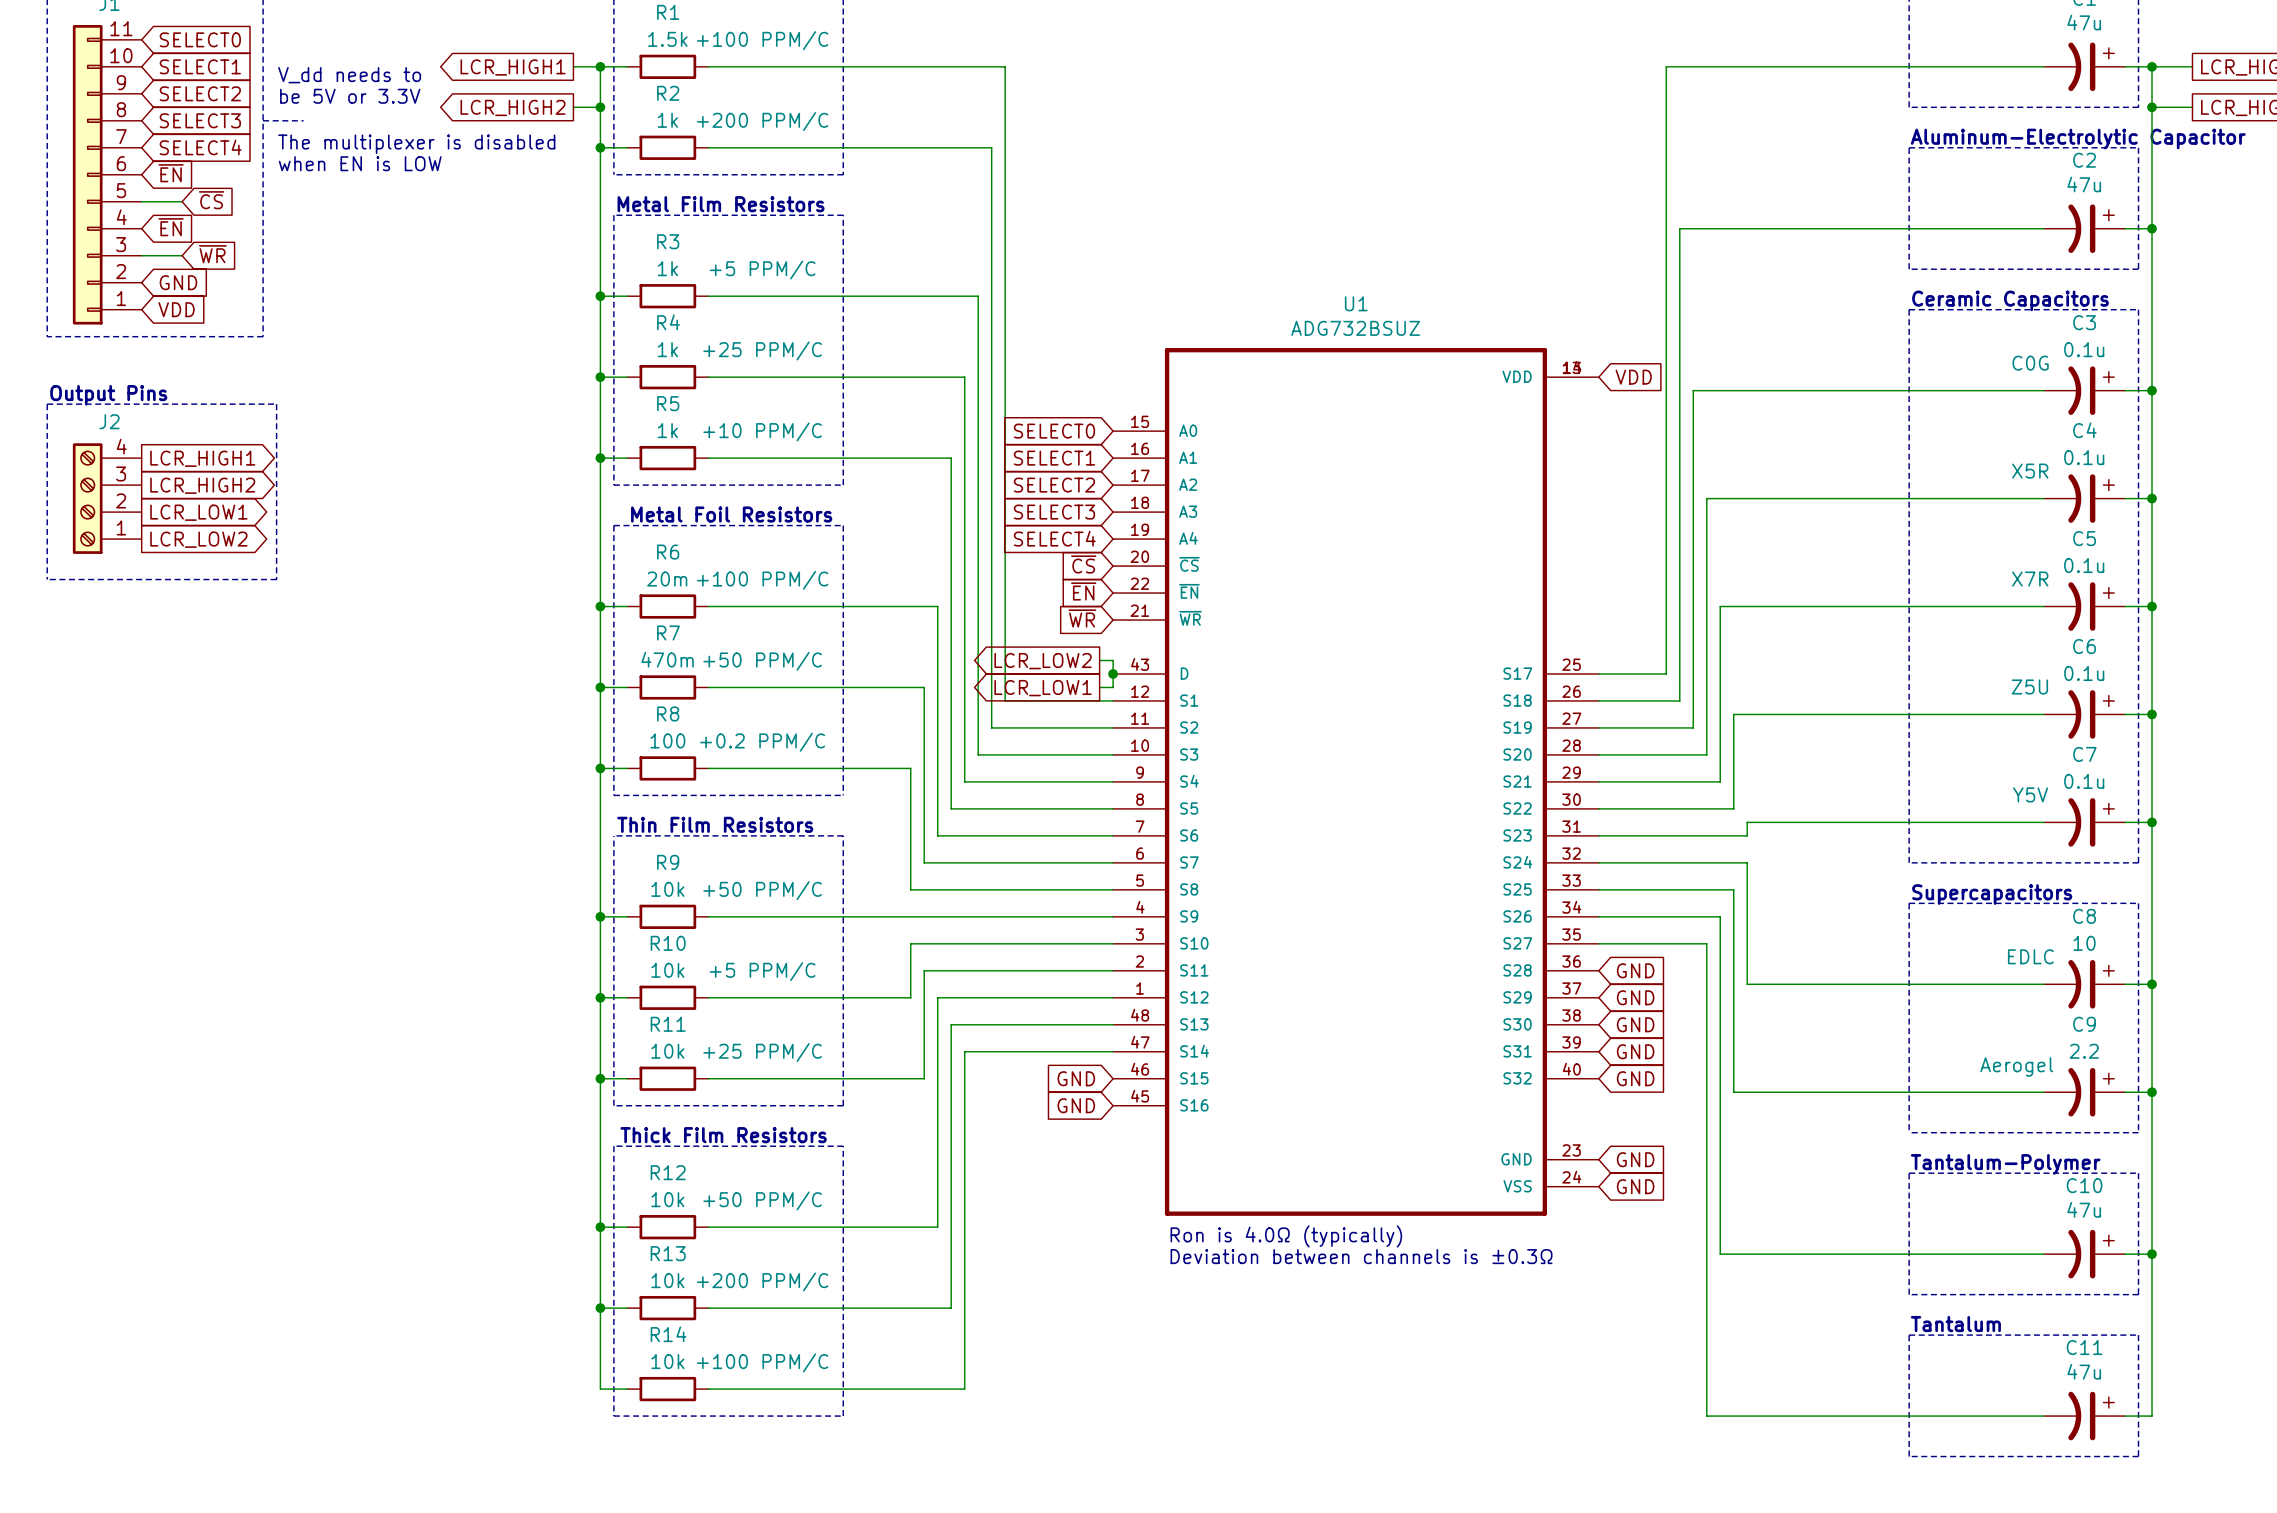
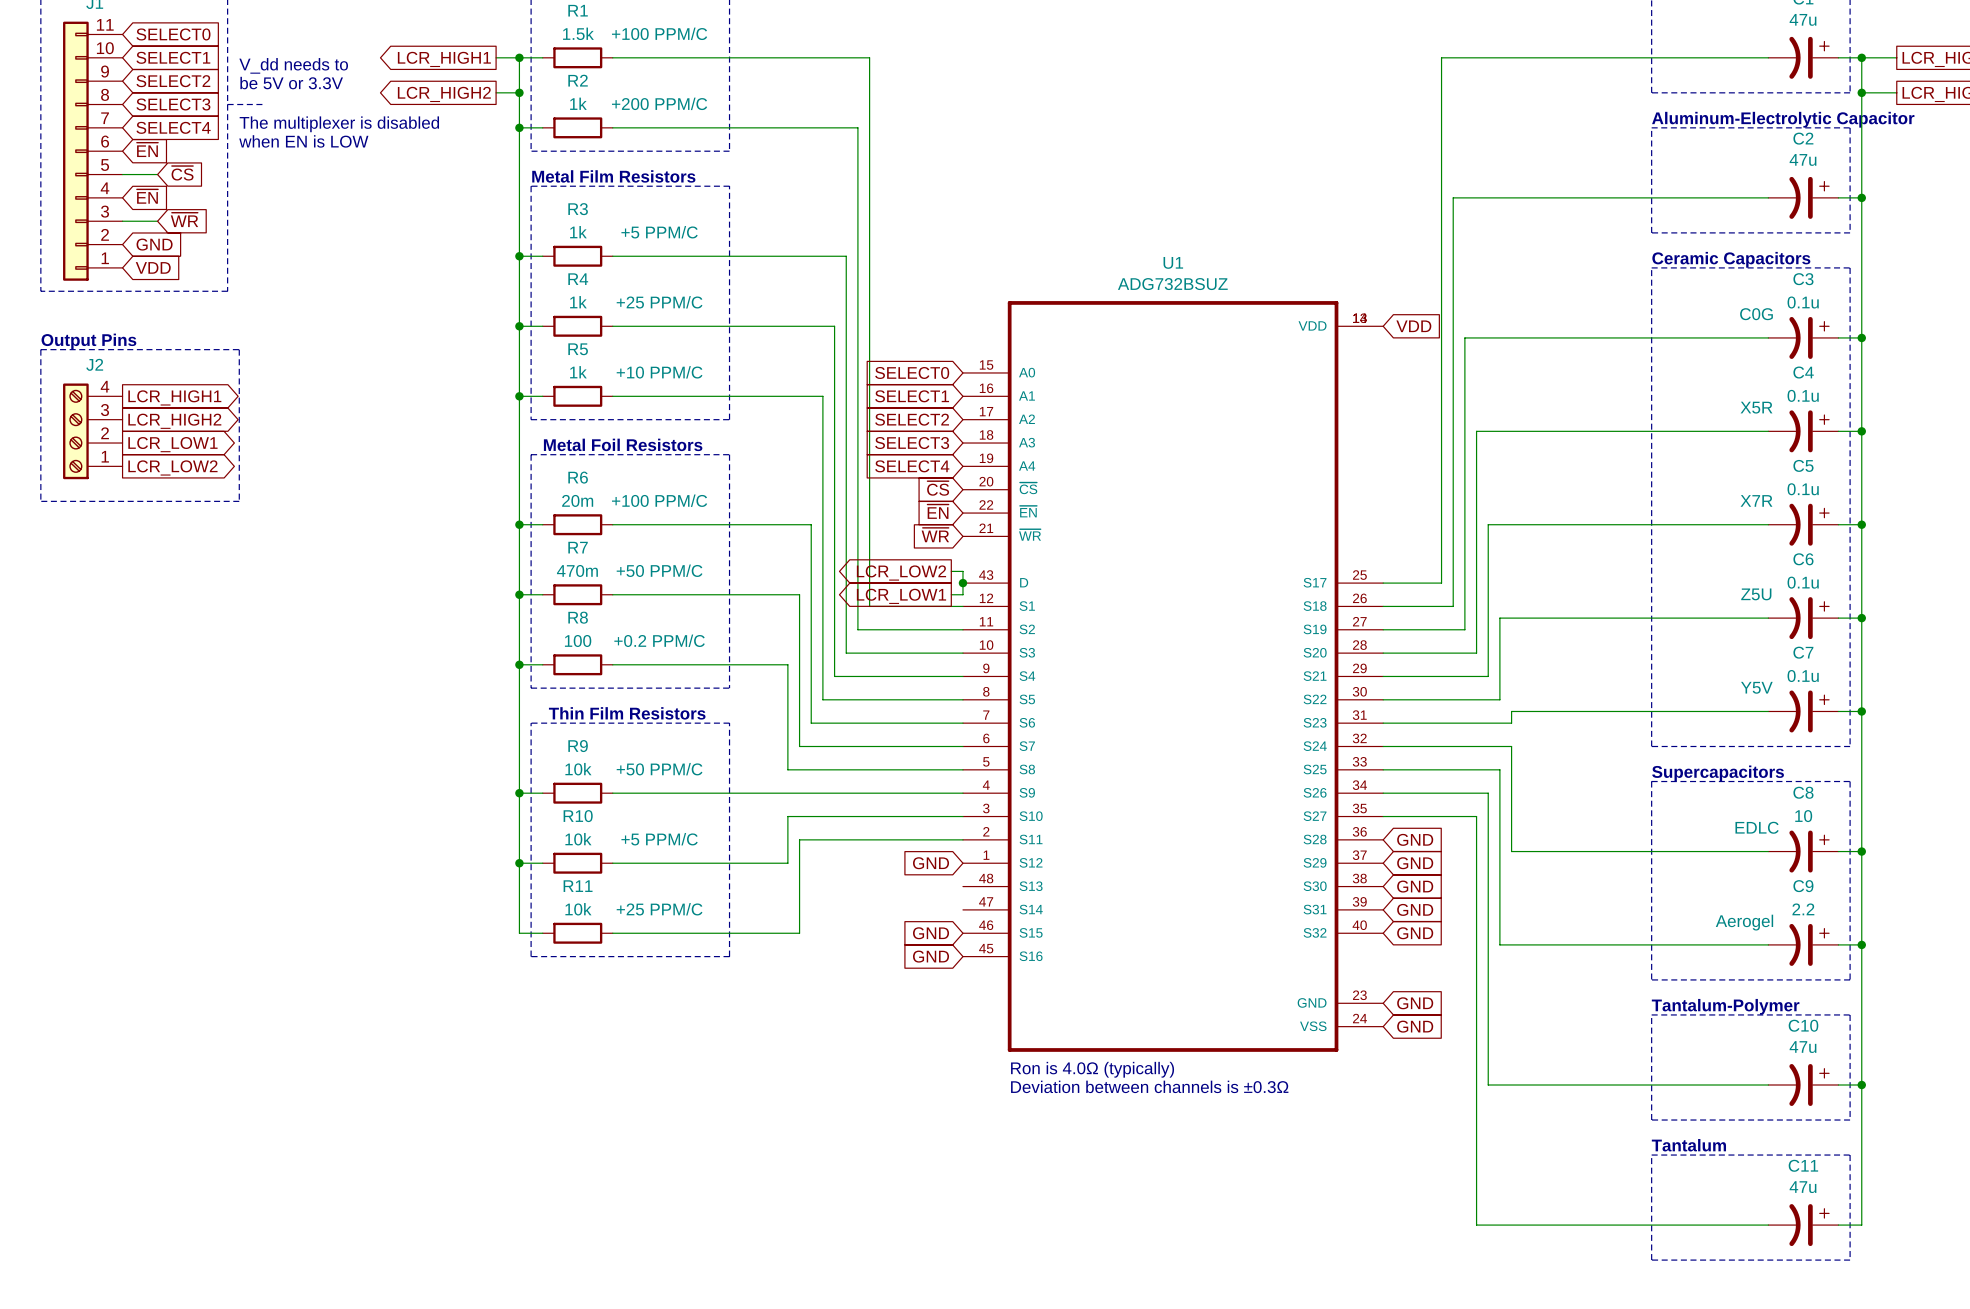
global label: none -> GND (931, 863)
wire: (1113, 997) (937, 997) (937, 1227) (708, 1227) -> none
wire: (1113, 1024) (951, 1024) (951, 1308) (708, 1308) -> none
wire: (1113, 1051) (964, 1051) (964, 1389) (708, 1389) -> none
wire: (600, 1078) (600, 1389) (627, 1389) -> none
junction: (600, 1078) -> none
text: Thick Film Resistors (723, 1135) -> none
line: (613, 1146) (613, 1416) (843, 1416) (843, 1146) (613, 1146) -> none
wire: (600, 1227) (627, 1227) -> none
junction: (600, 1227) -> none
R12: 10k (667, 1227) -> none
wire: (600, 1308) (627, 1308) -> none
junction: (600, 1308) -> none
R13: 10k (667, 1308) -> none
R14: 10k (667, 1389) -> none

